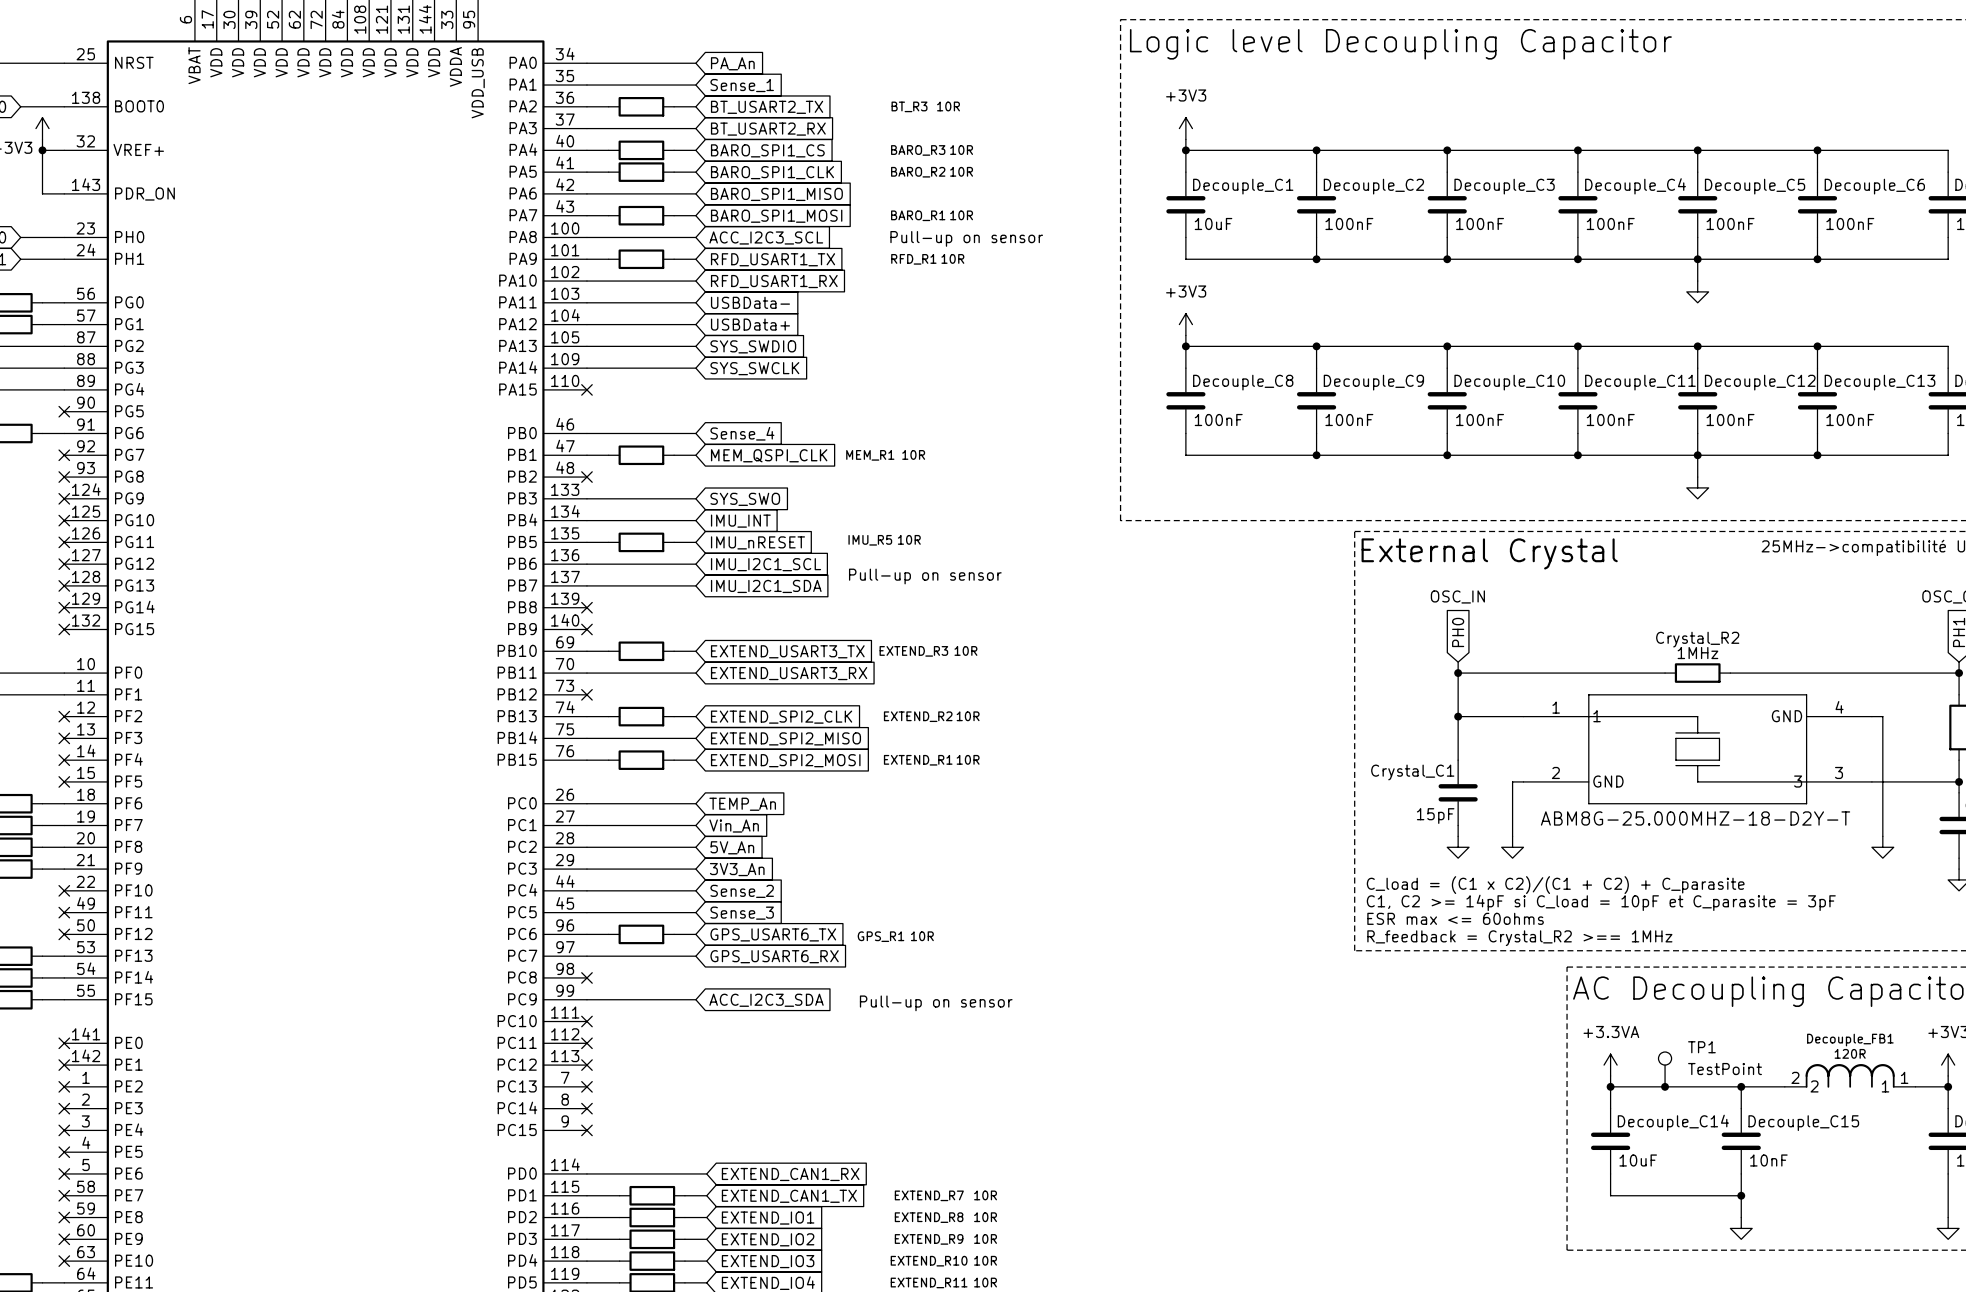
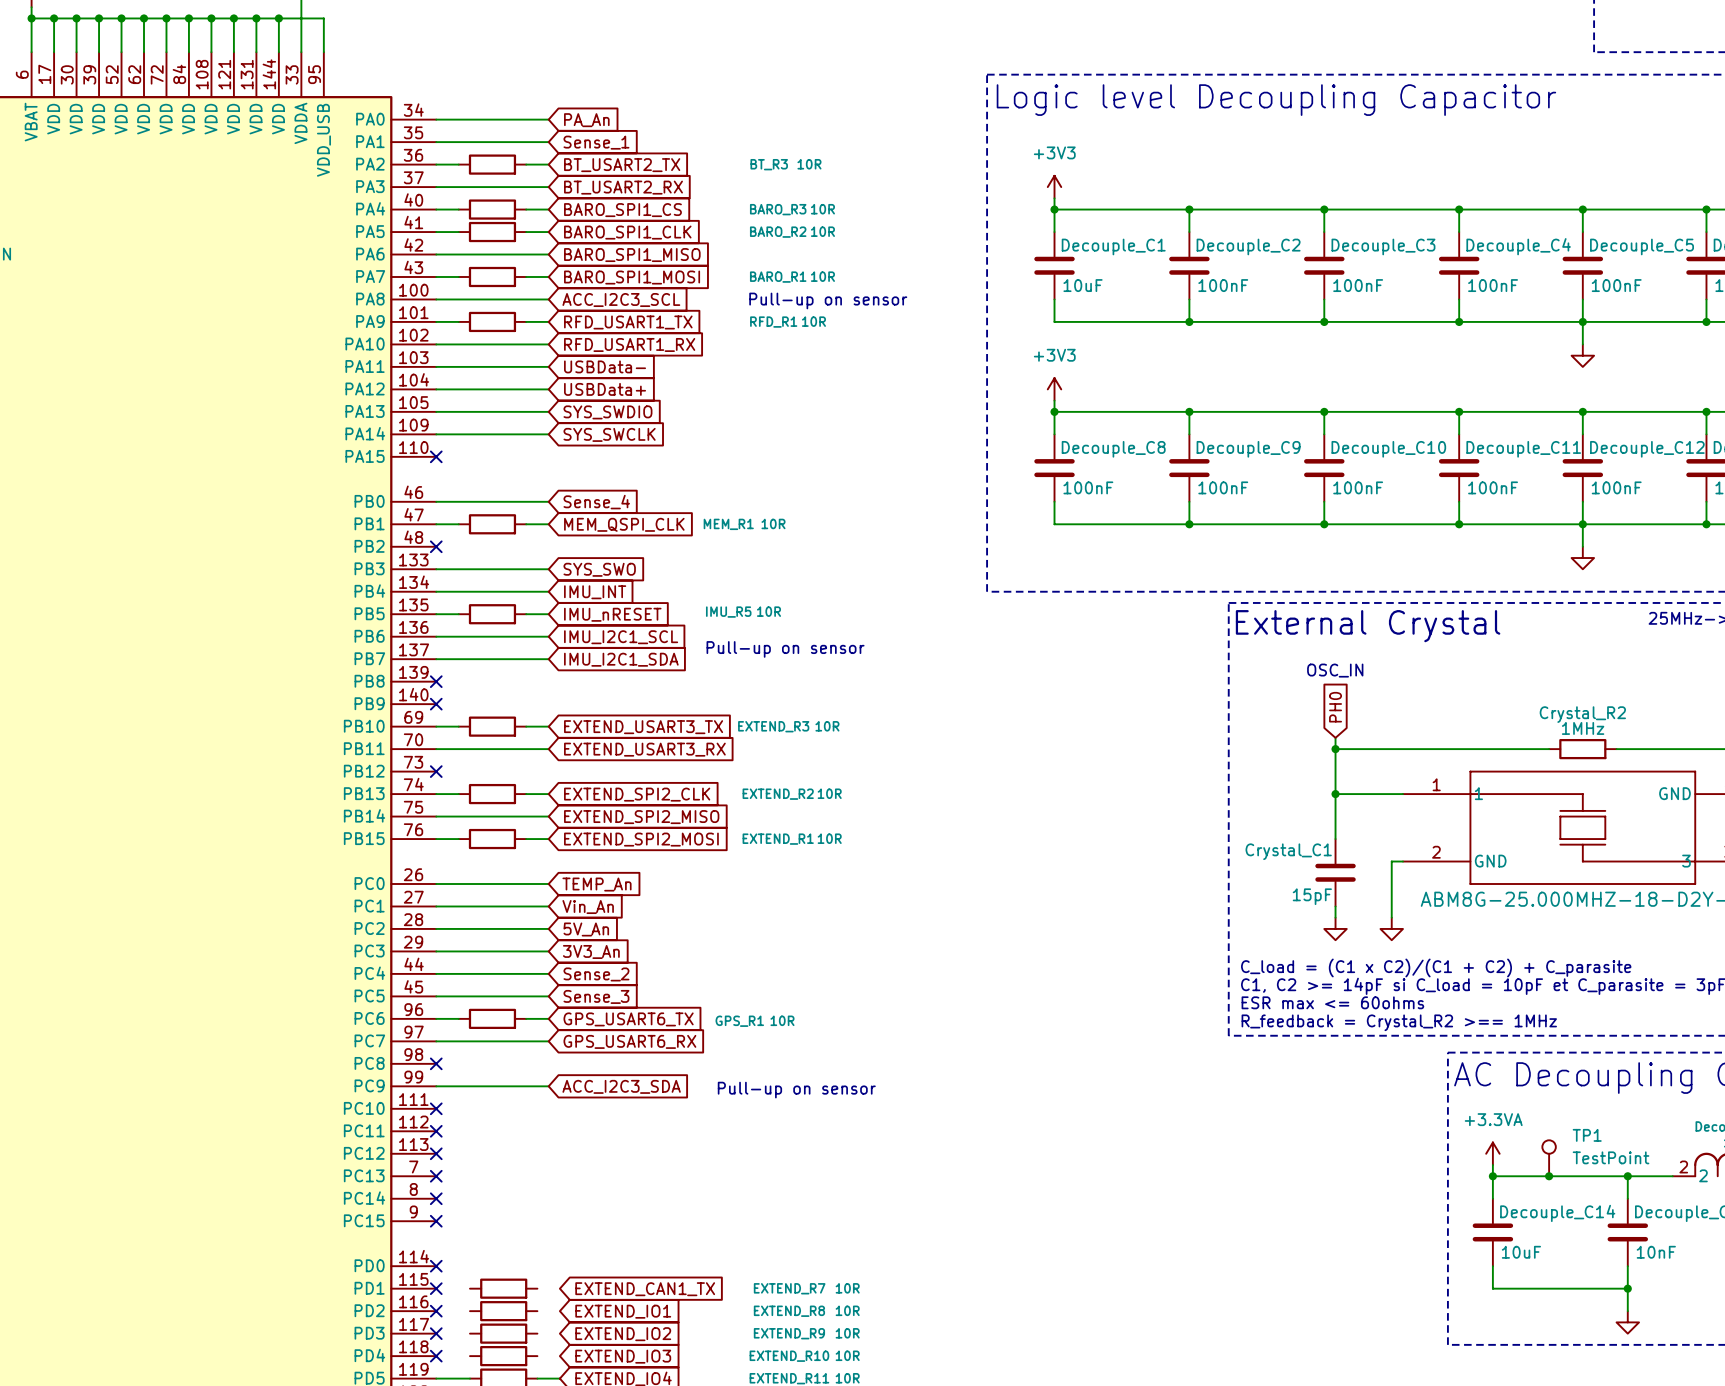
wire: (586, 1173) (706, 1173) -> none
no-connect mark: none -> (436, 1266)
global label: EXTEND_CAN1_RX (790, 1174) -> none
wire: (586, 1195) (619, 1195) -> none
no-connect mark: none -> (436, 1288)
wire: (684, 1195) (706, 1195) -> none
wire: (586, 1217) (619, 1217) -> none
no-connect mark: none -> (436, 1311)
wire: (684, 1217) (706, 1217) -> none
wire: (586, 1239) (619, 1239) -> none
no-connect mark: none -> (436, 1333)
wire: (684, 1239) (706, 1239) -> none
wire: (586, 1261) (619, 1261) -> none
no-connect mark: none -> (436, 1356)
wire: (684, 1261) (706, 1261) -> none

